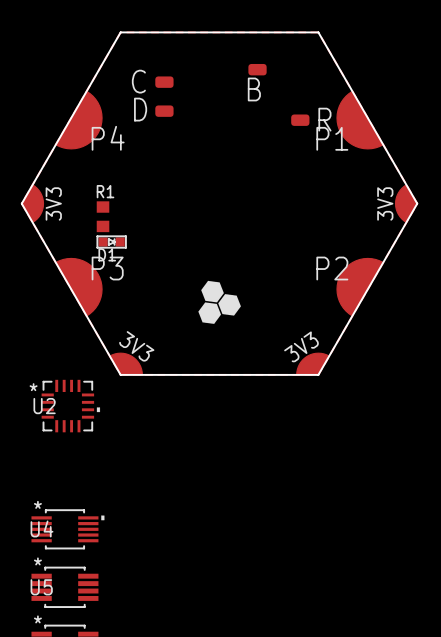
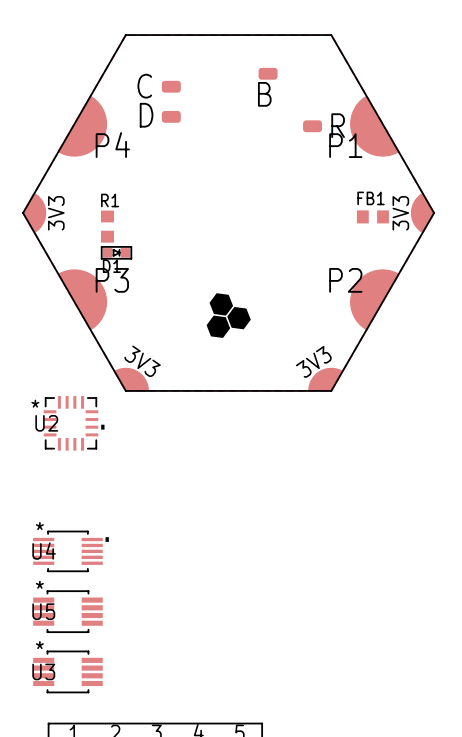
FB1: none -> (372, 216)

